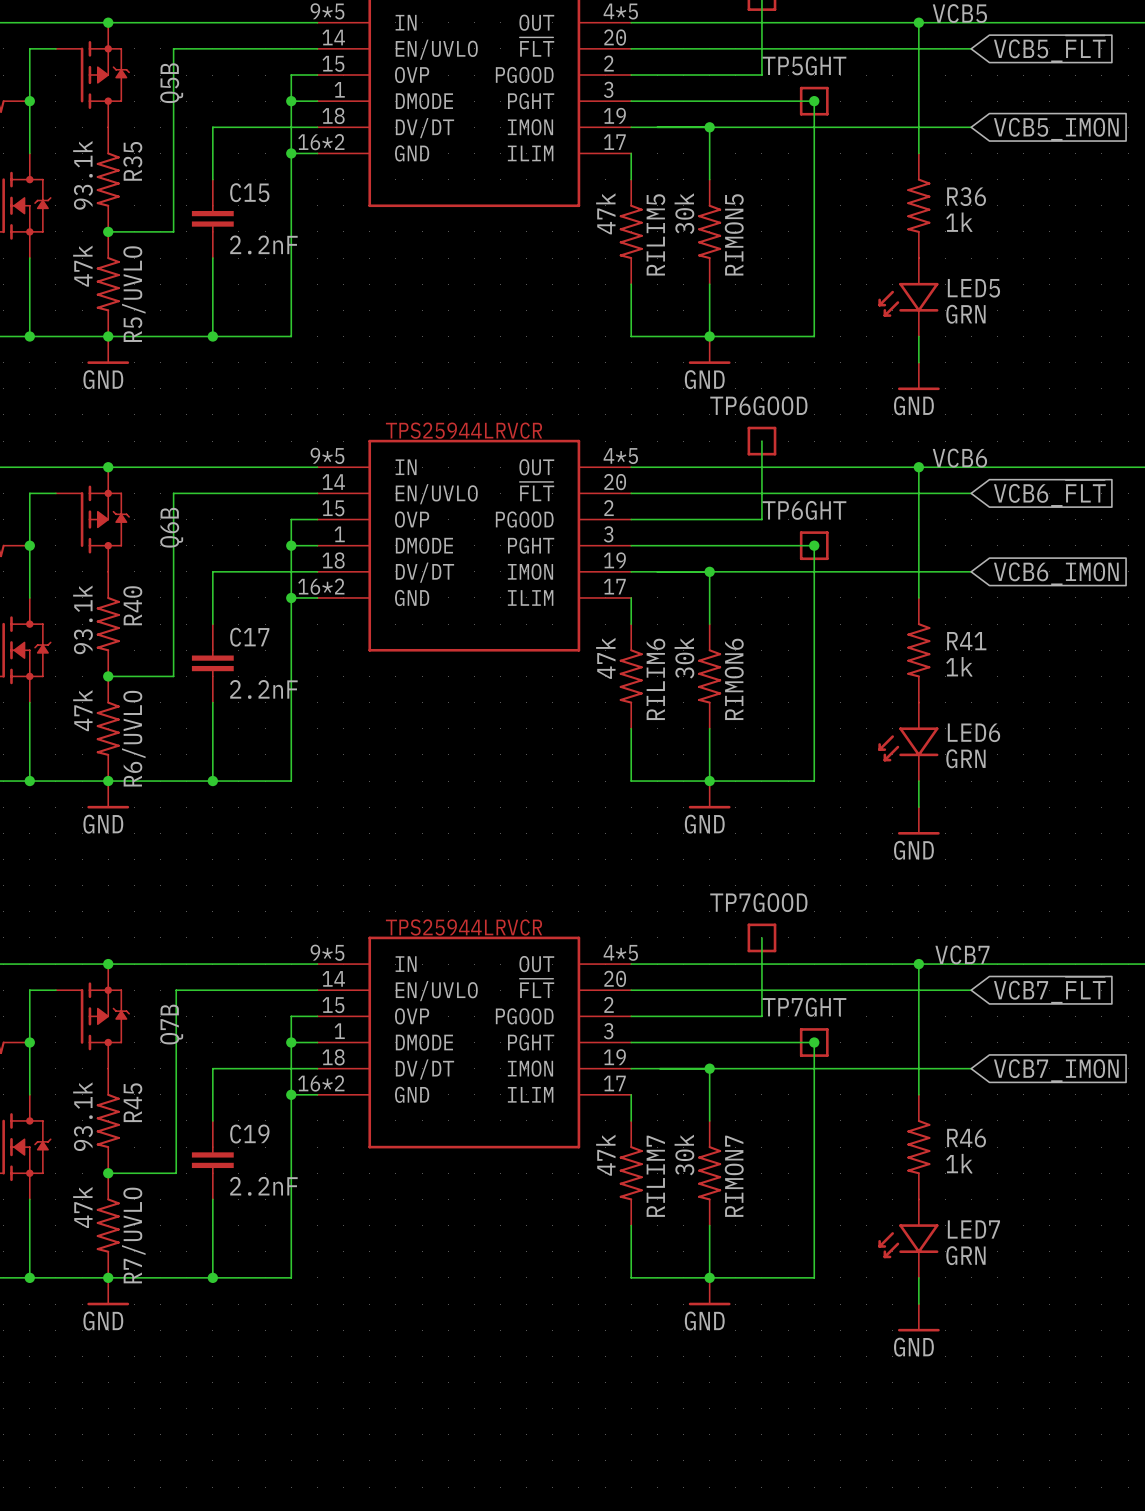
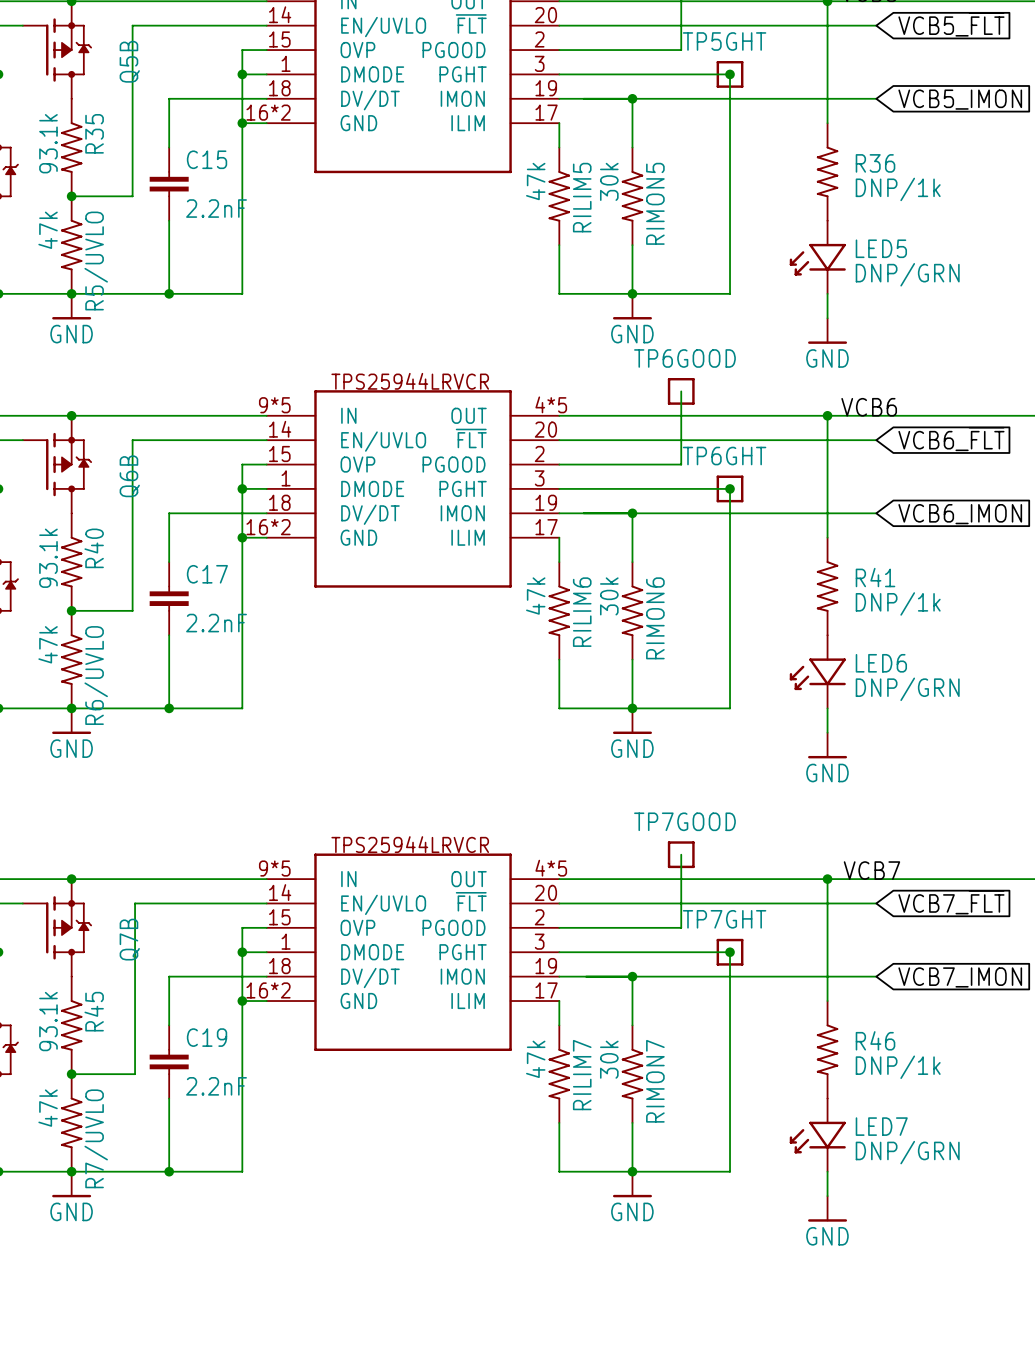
R36 value: 1k (959, 222) -> DNP/1k (898, 189)
LED5 value: GRN (965, 314) -> DNP/GRN (907, 274)
R41 value: 1k (959, 666) -> DNP/1k (898, 603)
LED6 value: GRN (965, 758) -> DNP/GRN (907, 689)
R46 value: 1k (959, 1163) -> DNP/1k (898, 1067)
LED7 value: GRN (965, 1255) -> DNP/GRN (907, 1152)

